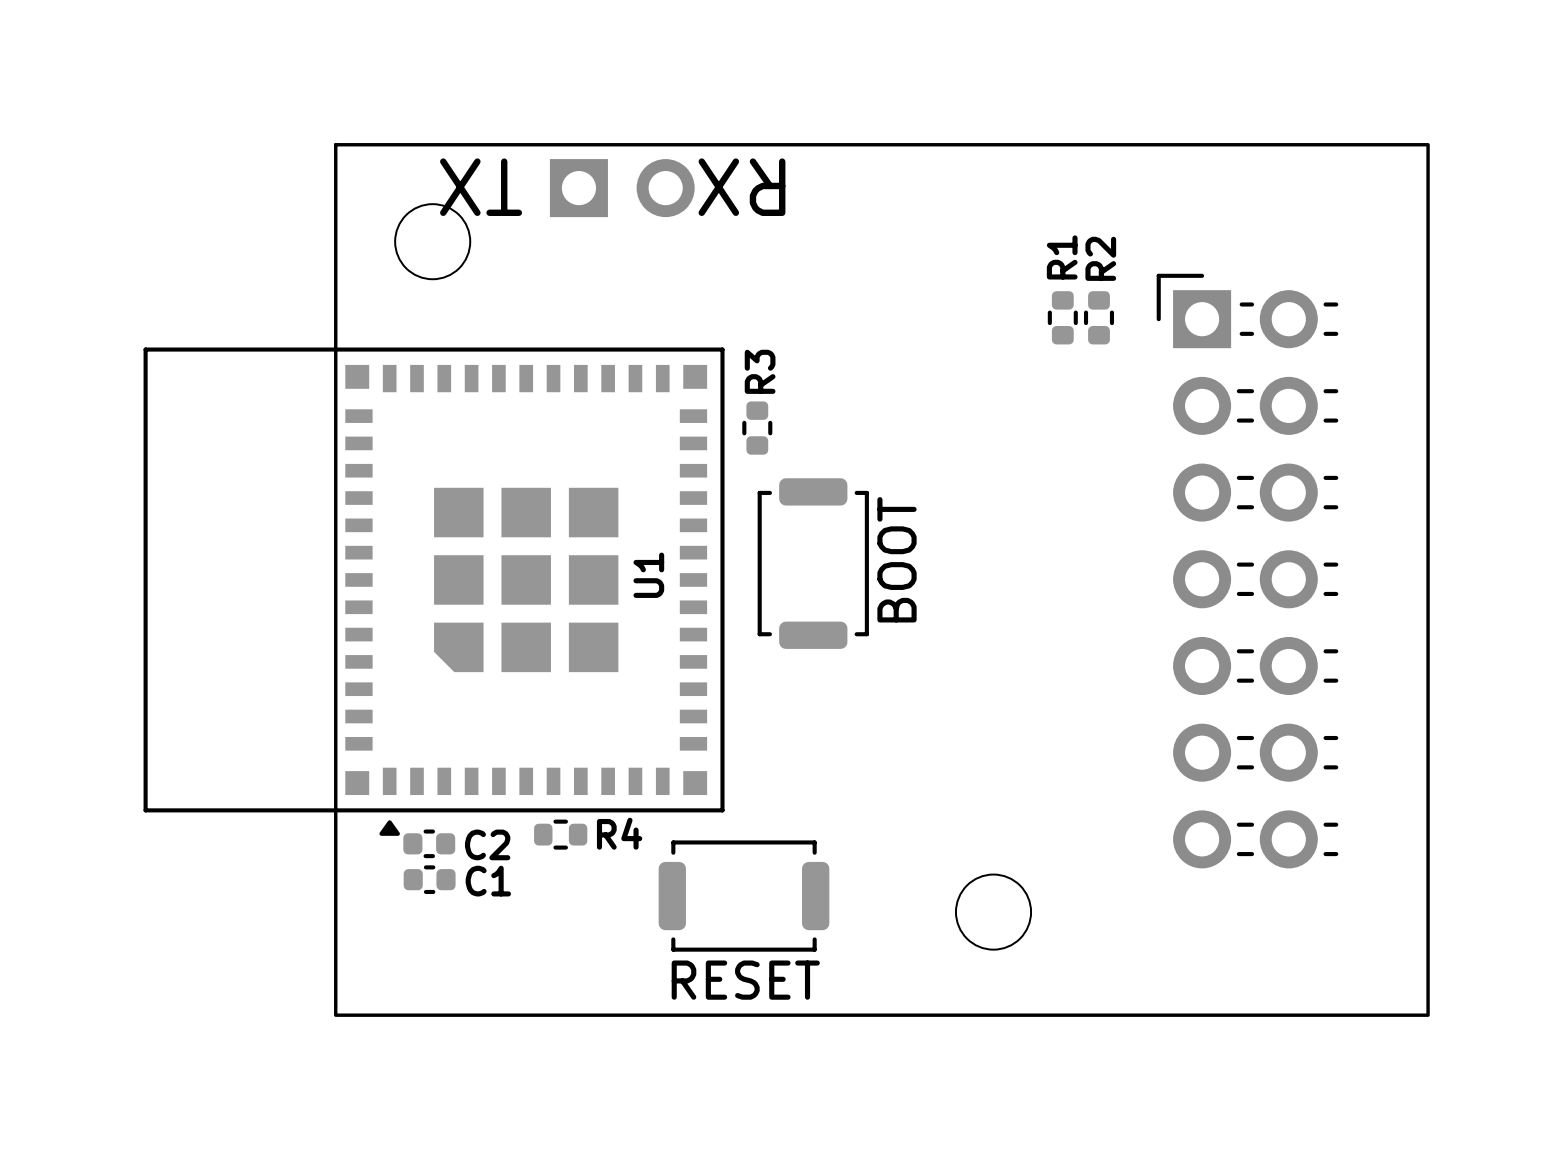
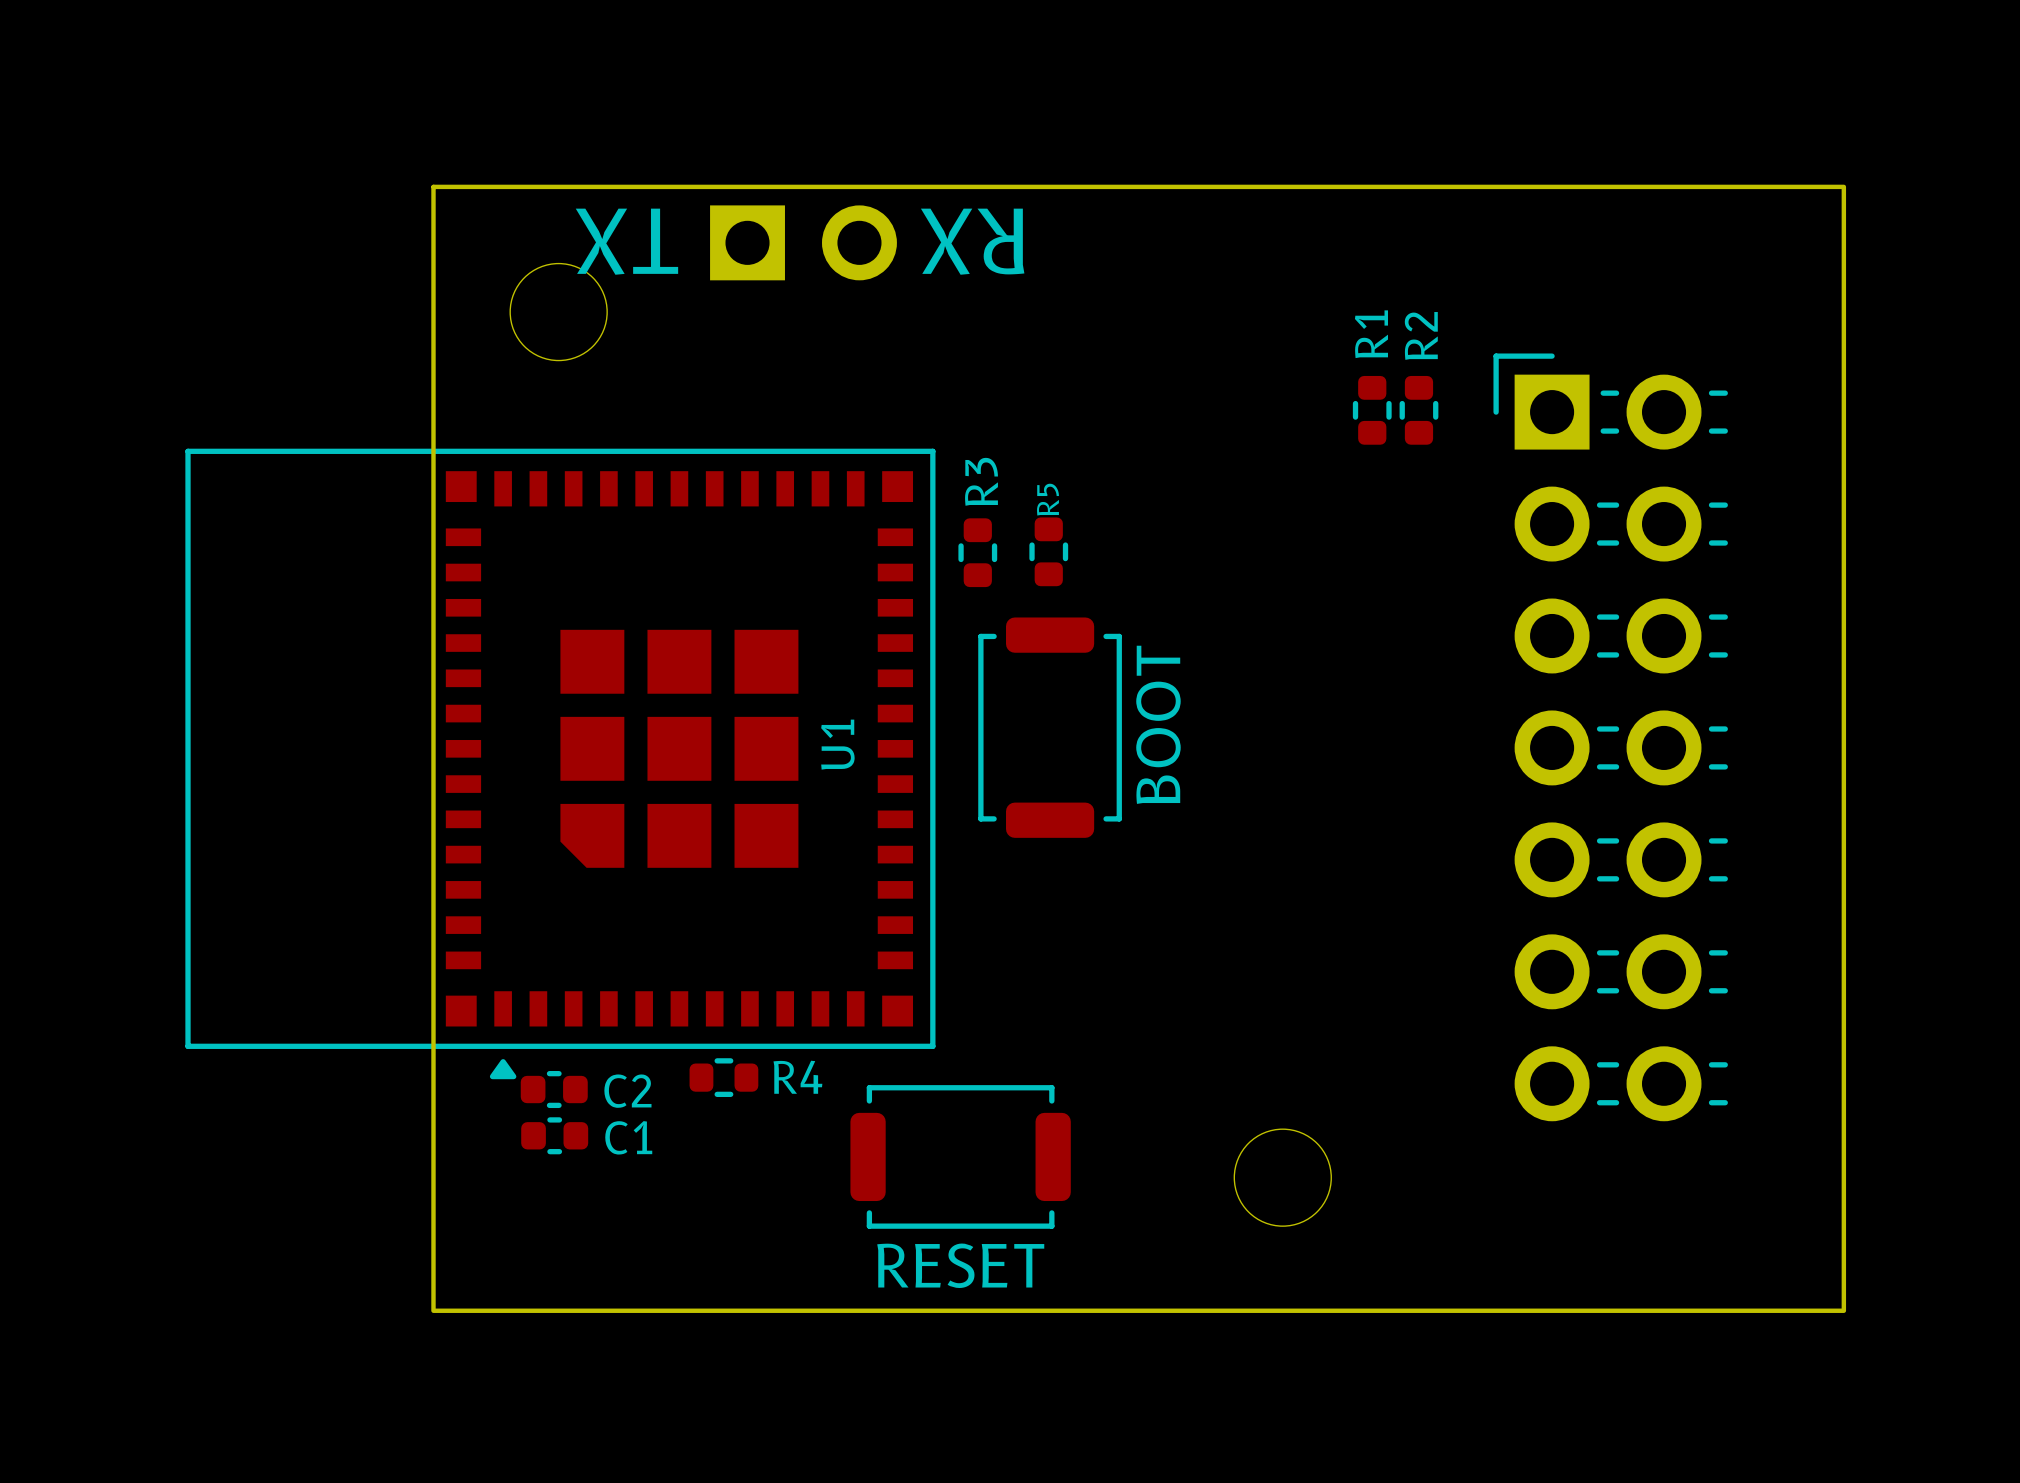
R5: none -> (1048, 551)

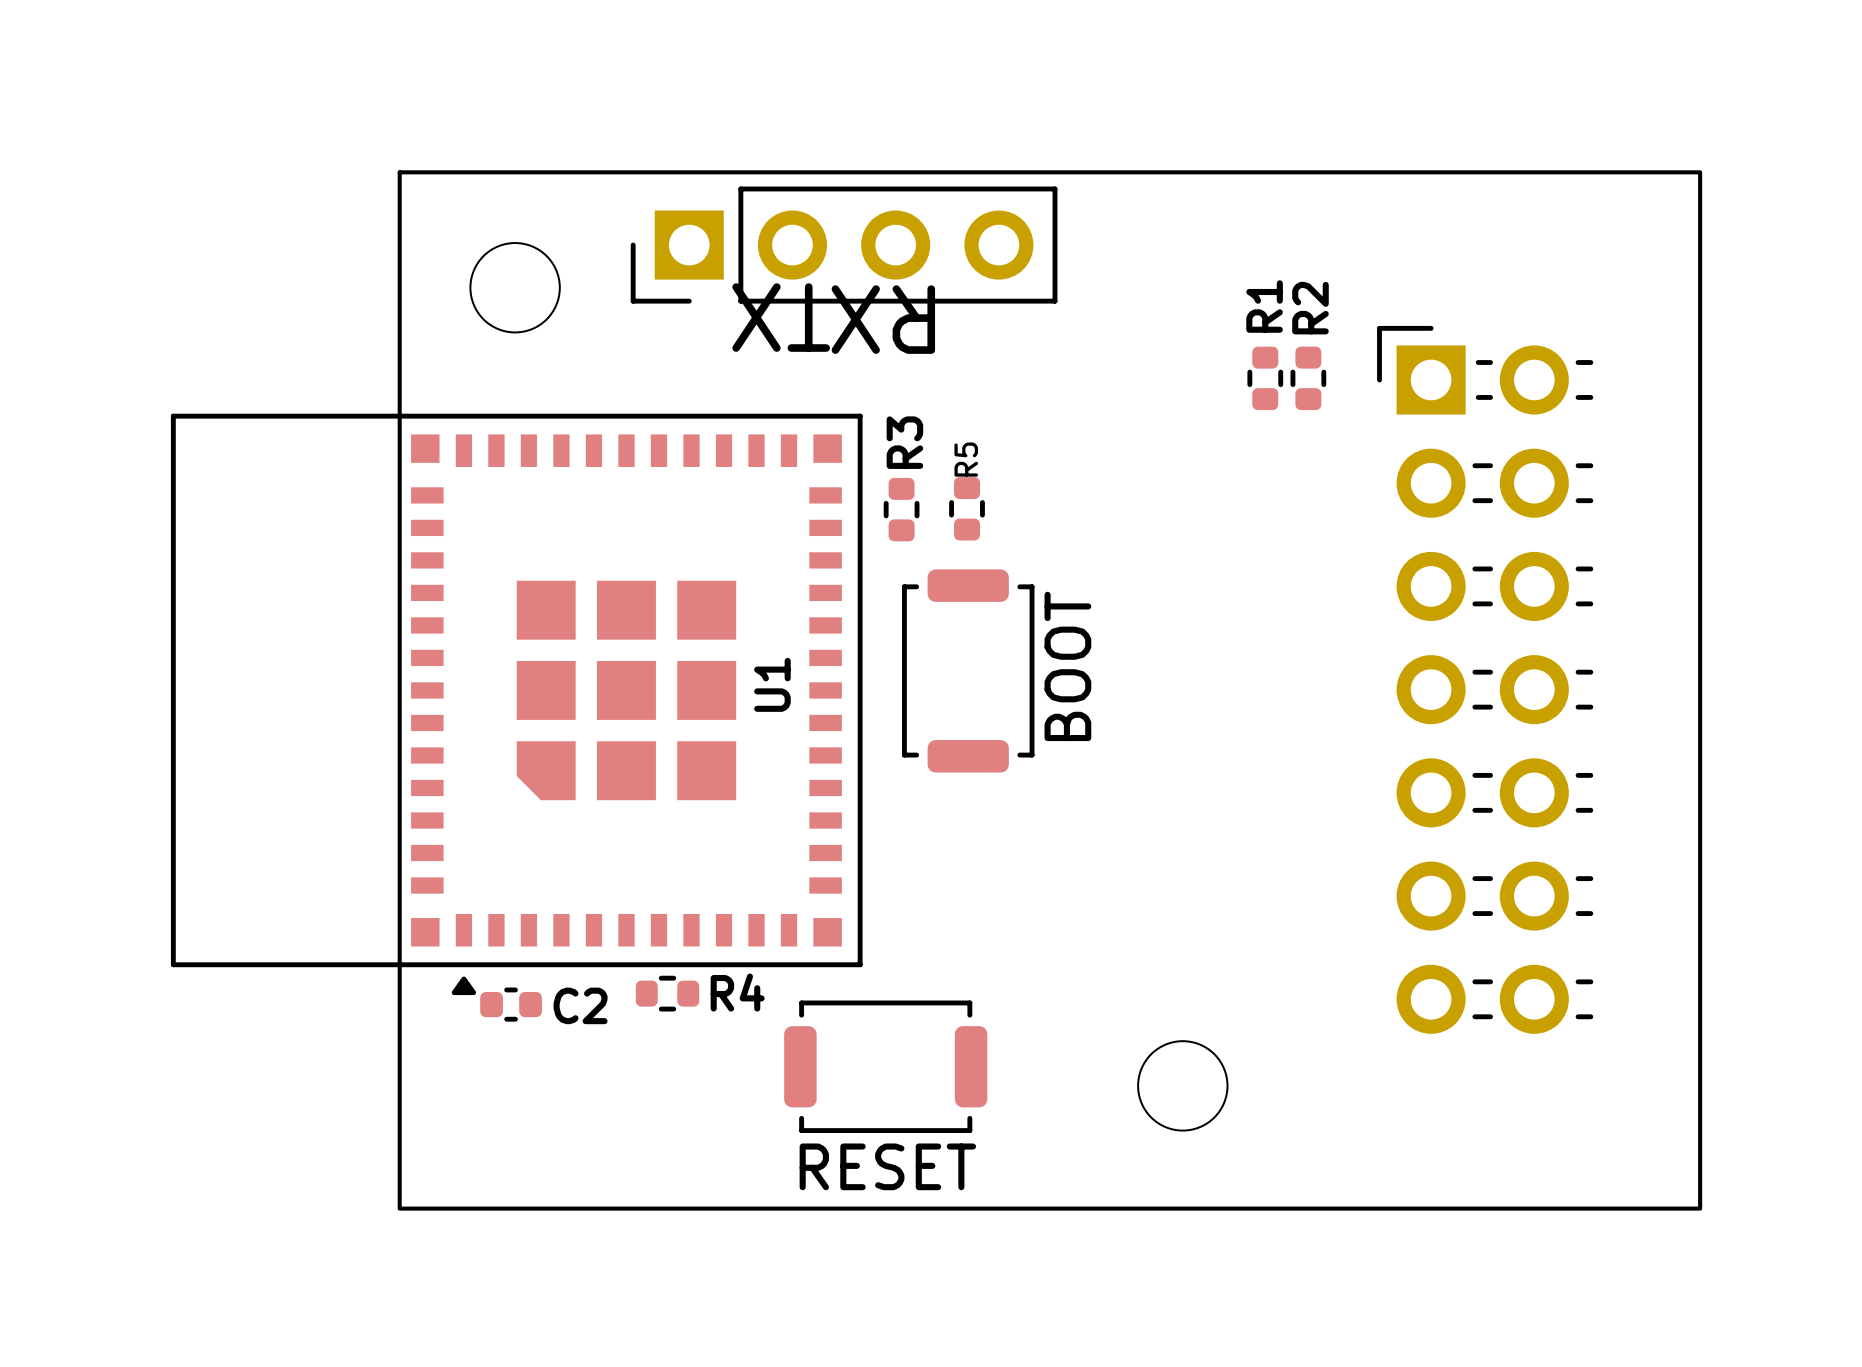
text position: TX (626, 241) -> TX (781, 317)
text position: RX (972, 241) -> RX (883, 319)
part: (803, 242) -> none
part: none -> (844, 245)
C1: (554, 1135) -> none

